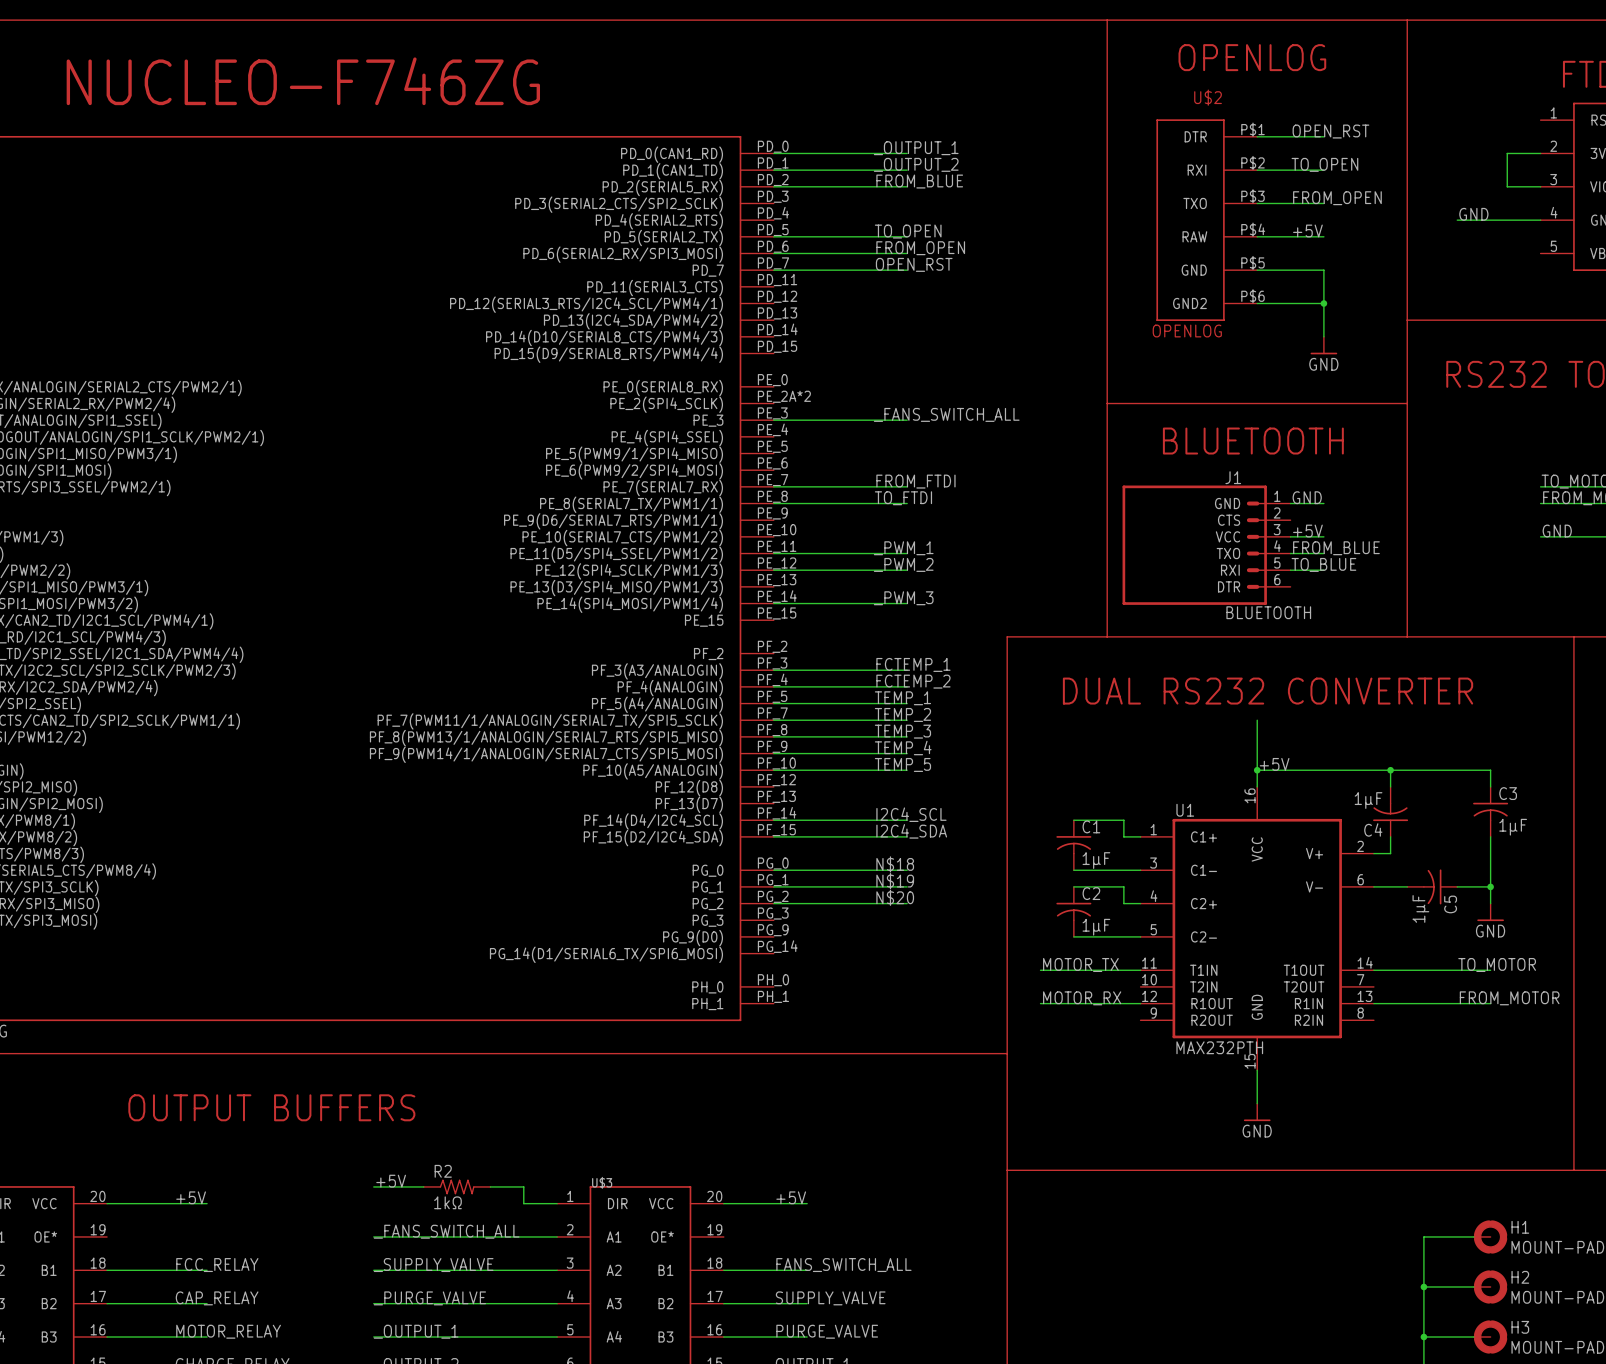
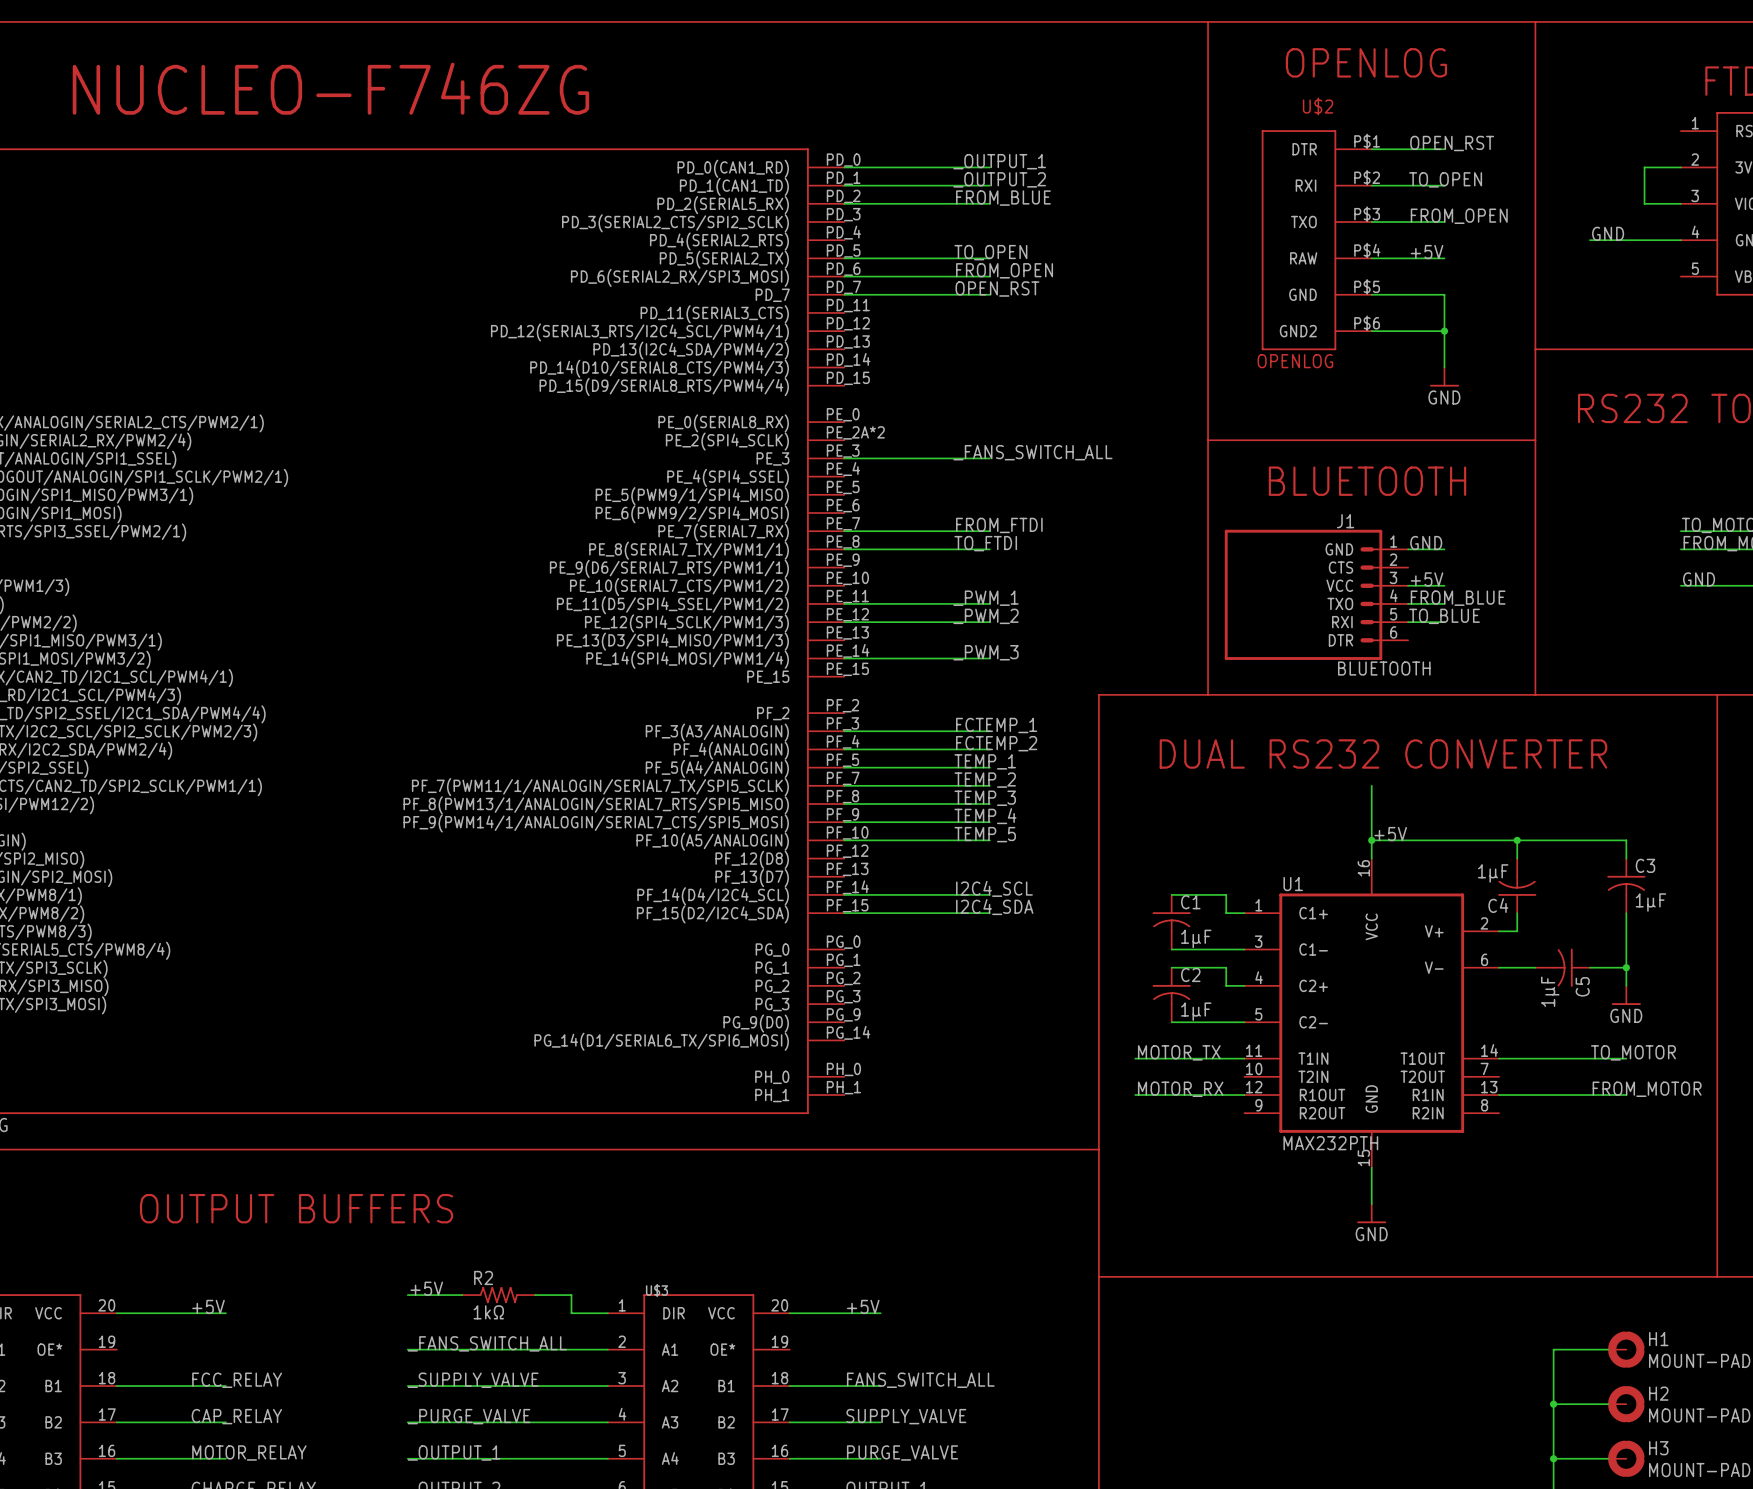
label: N$18 (895, 864) -> none
wire: (773, 870) (907, 870) -> none
label: N$19 (895, 881) -> none
wire: (773, 886) (907, 886) -> none
label: N$20 (895, 897) -> none
wire: (773, 903) (907, 903) -> none

